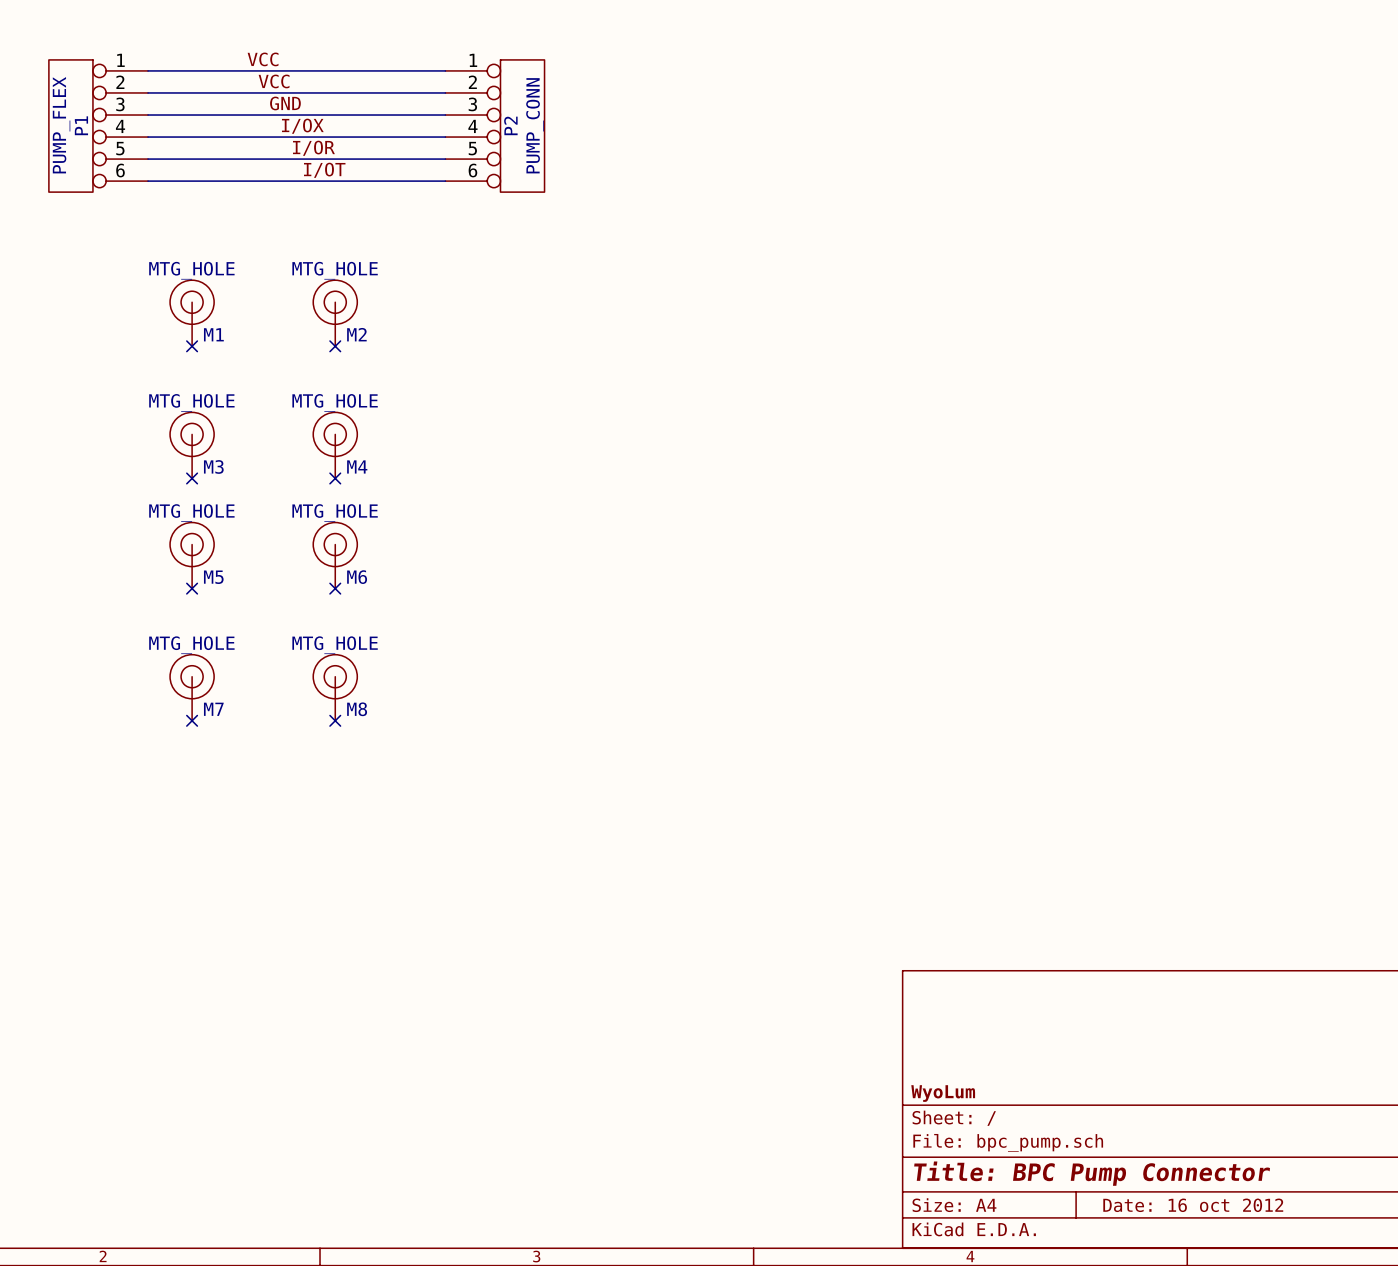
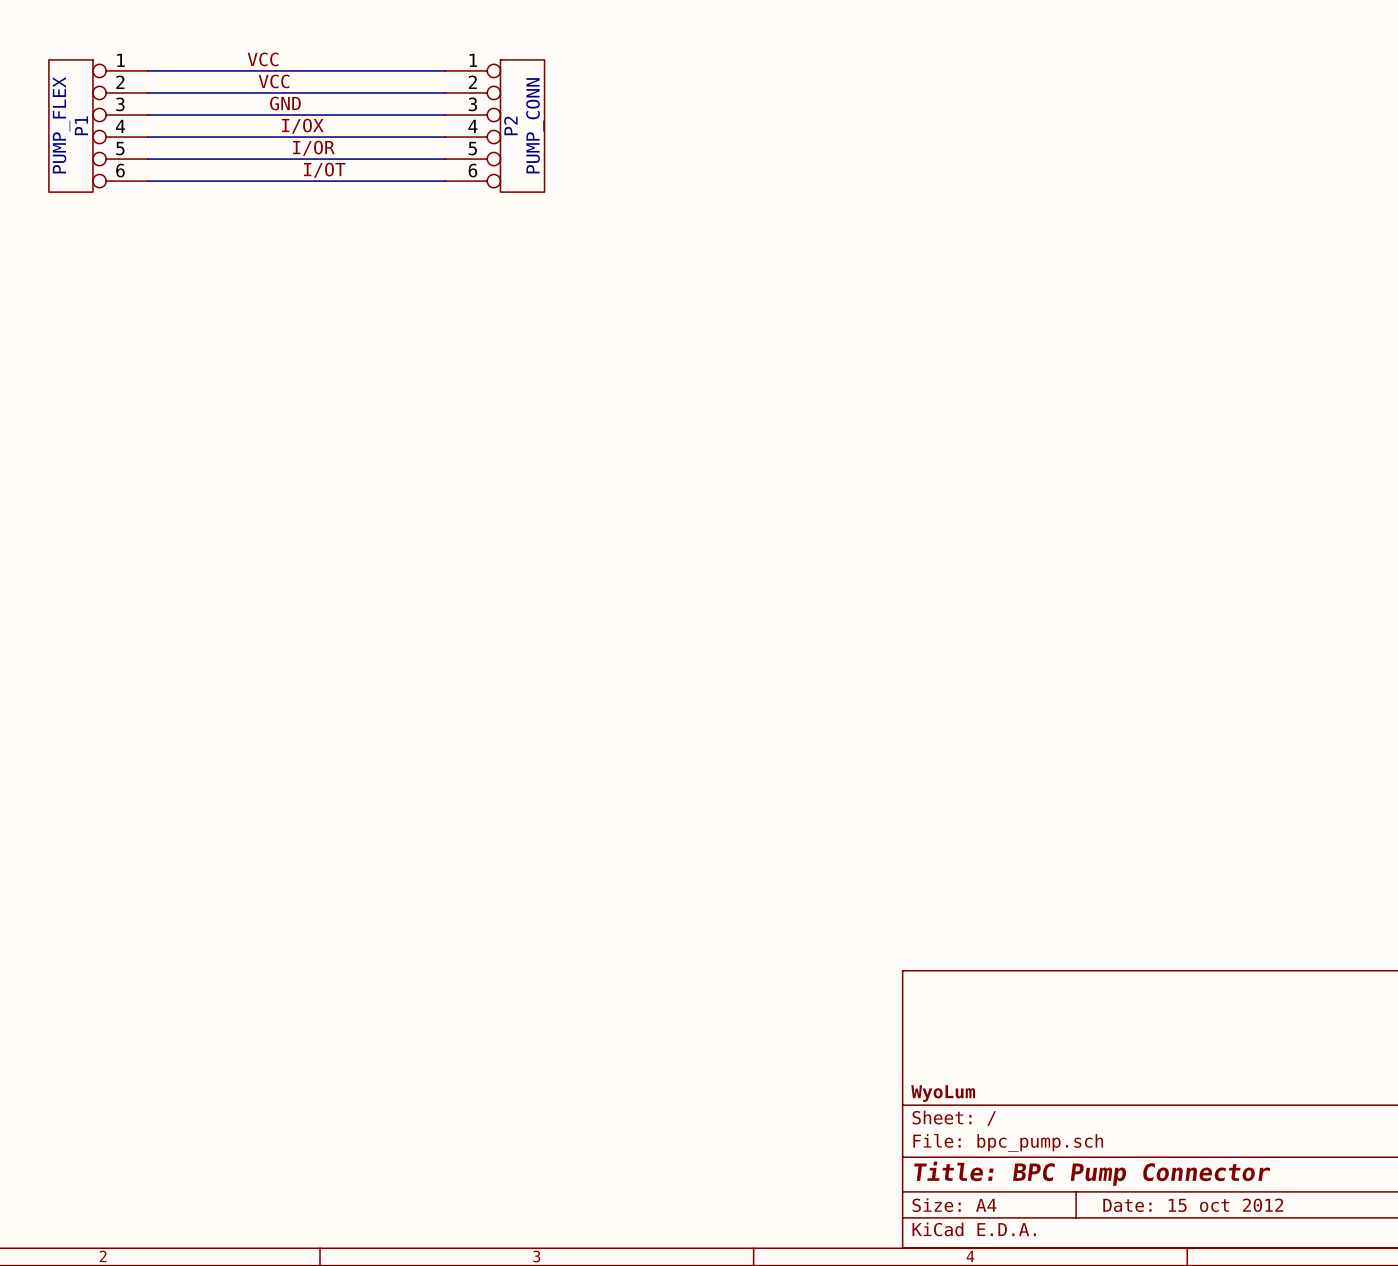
M1: MTG_HOLE (192, 313) -> none
M2: MTG_HOLE (335, 313) -> none
no-connect mark: (192, 346) -> none
no-connect mark: (335, 346) -> none
M3: MTG_HOLE (192, 445) -> none
M4: MTG_HOLE (335, 445) -> none
no-connect mark: (192, 478) -> none
no-connect mark: (335, 478) -> none
M5: MTG_HOLE (192, 555) -> none
M6: MTG_HOLE (335, 555) -> none
no-connect mark: (192, 588) -> none
no-connect mark: (335, 588) -> none
M7: MTG_HOLE (192, 687) -> none
M8: MTG_HOLE (335, 687) -> none
no-connect mark: (192, 720) -> none
no-connect mark: (335, 720) -> none
title block: Date: 16 oct 2012 (1193, 1205) -> Date: 15 oct 2012 (1193, 1205)

